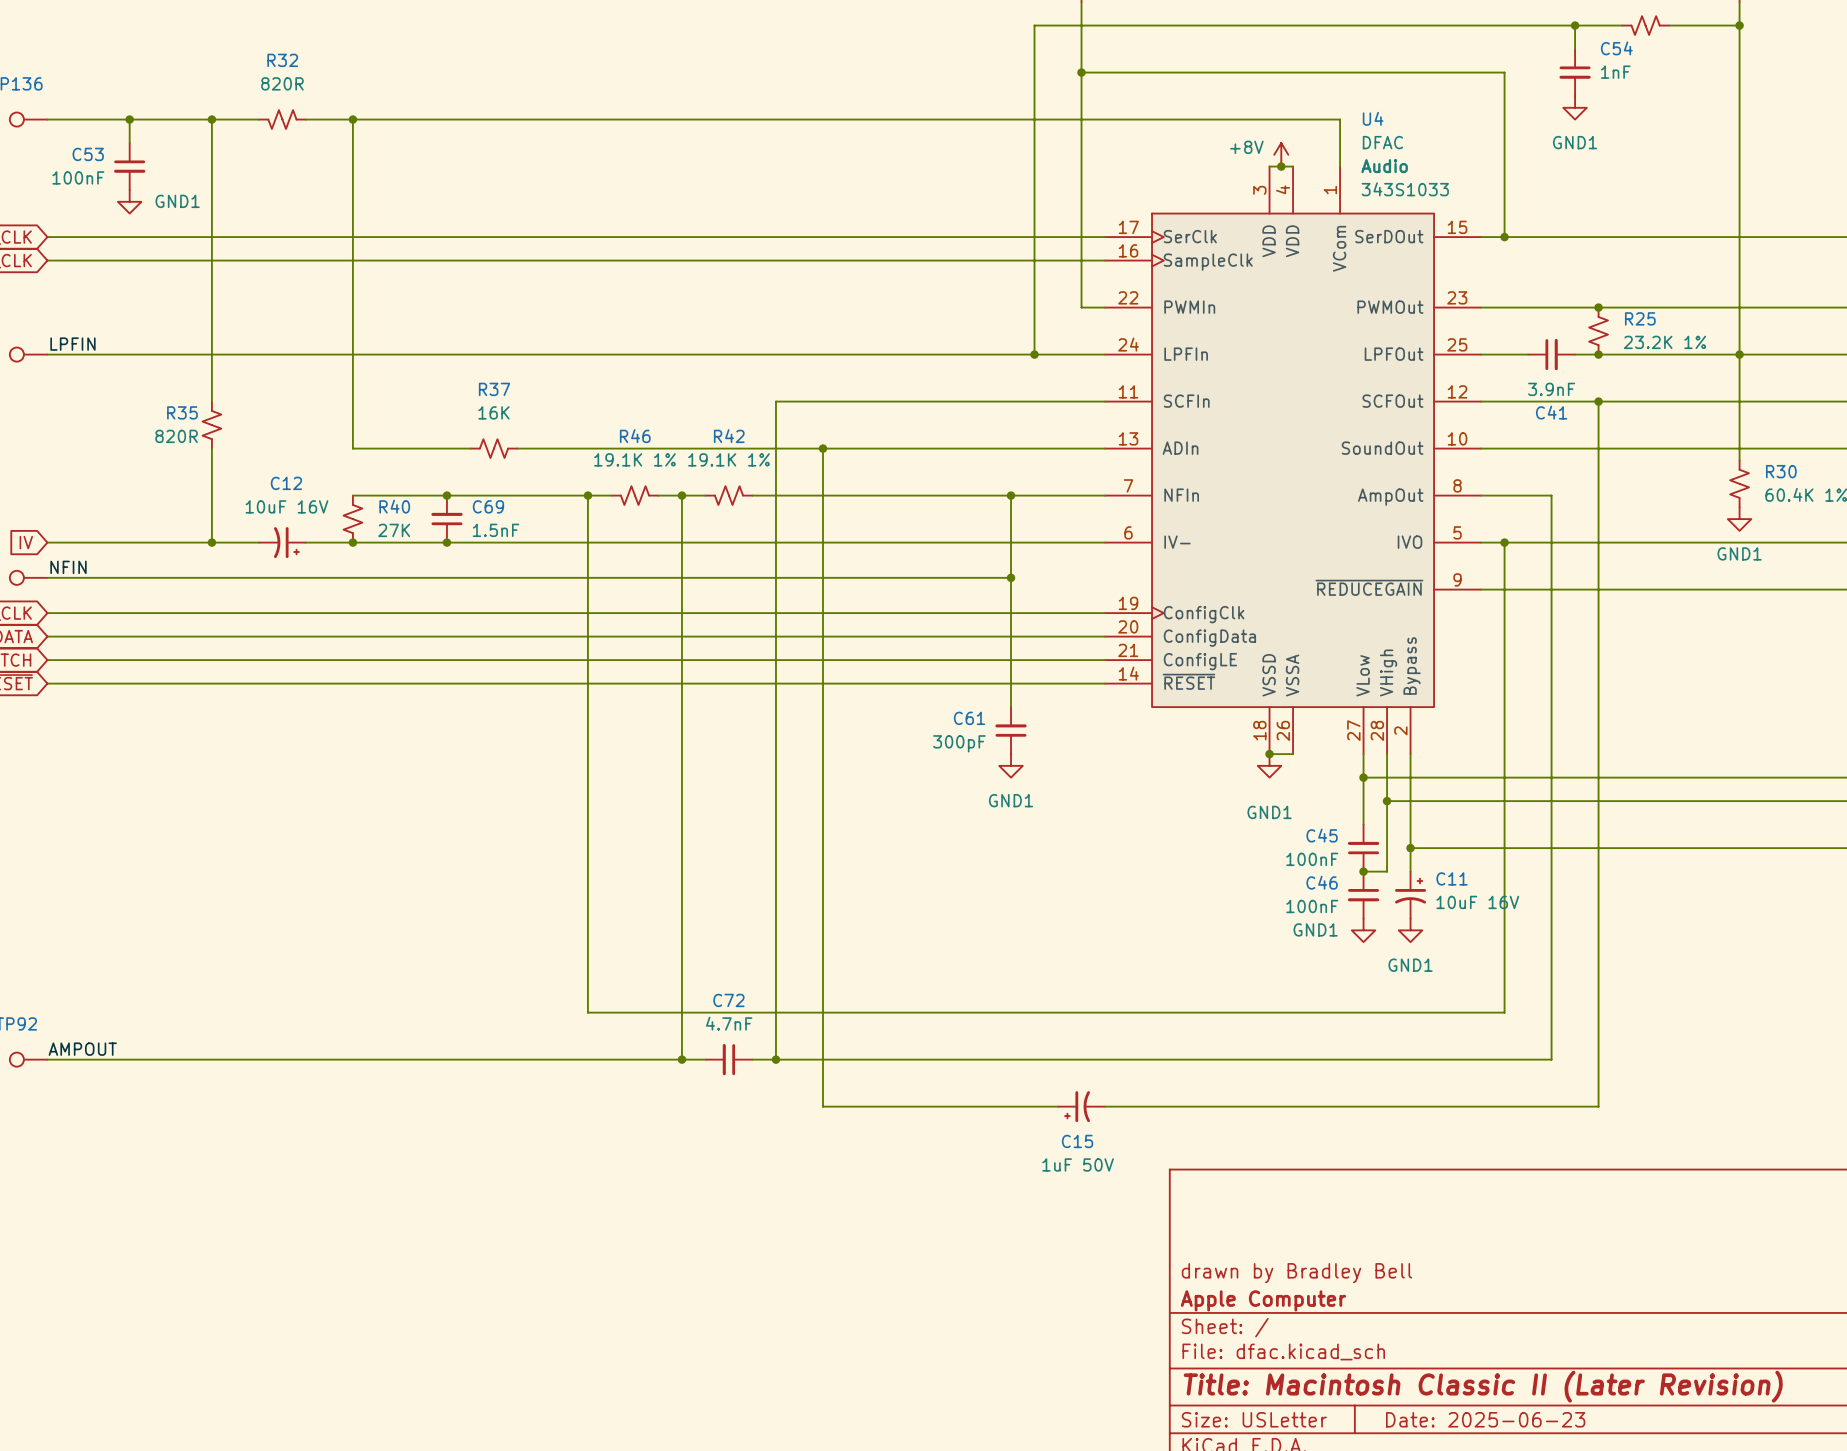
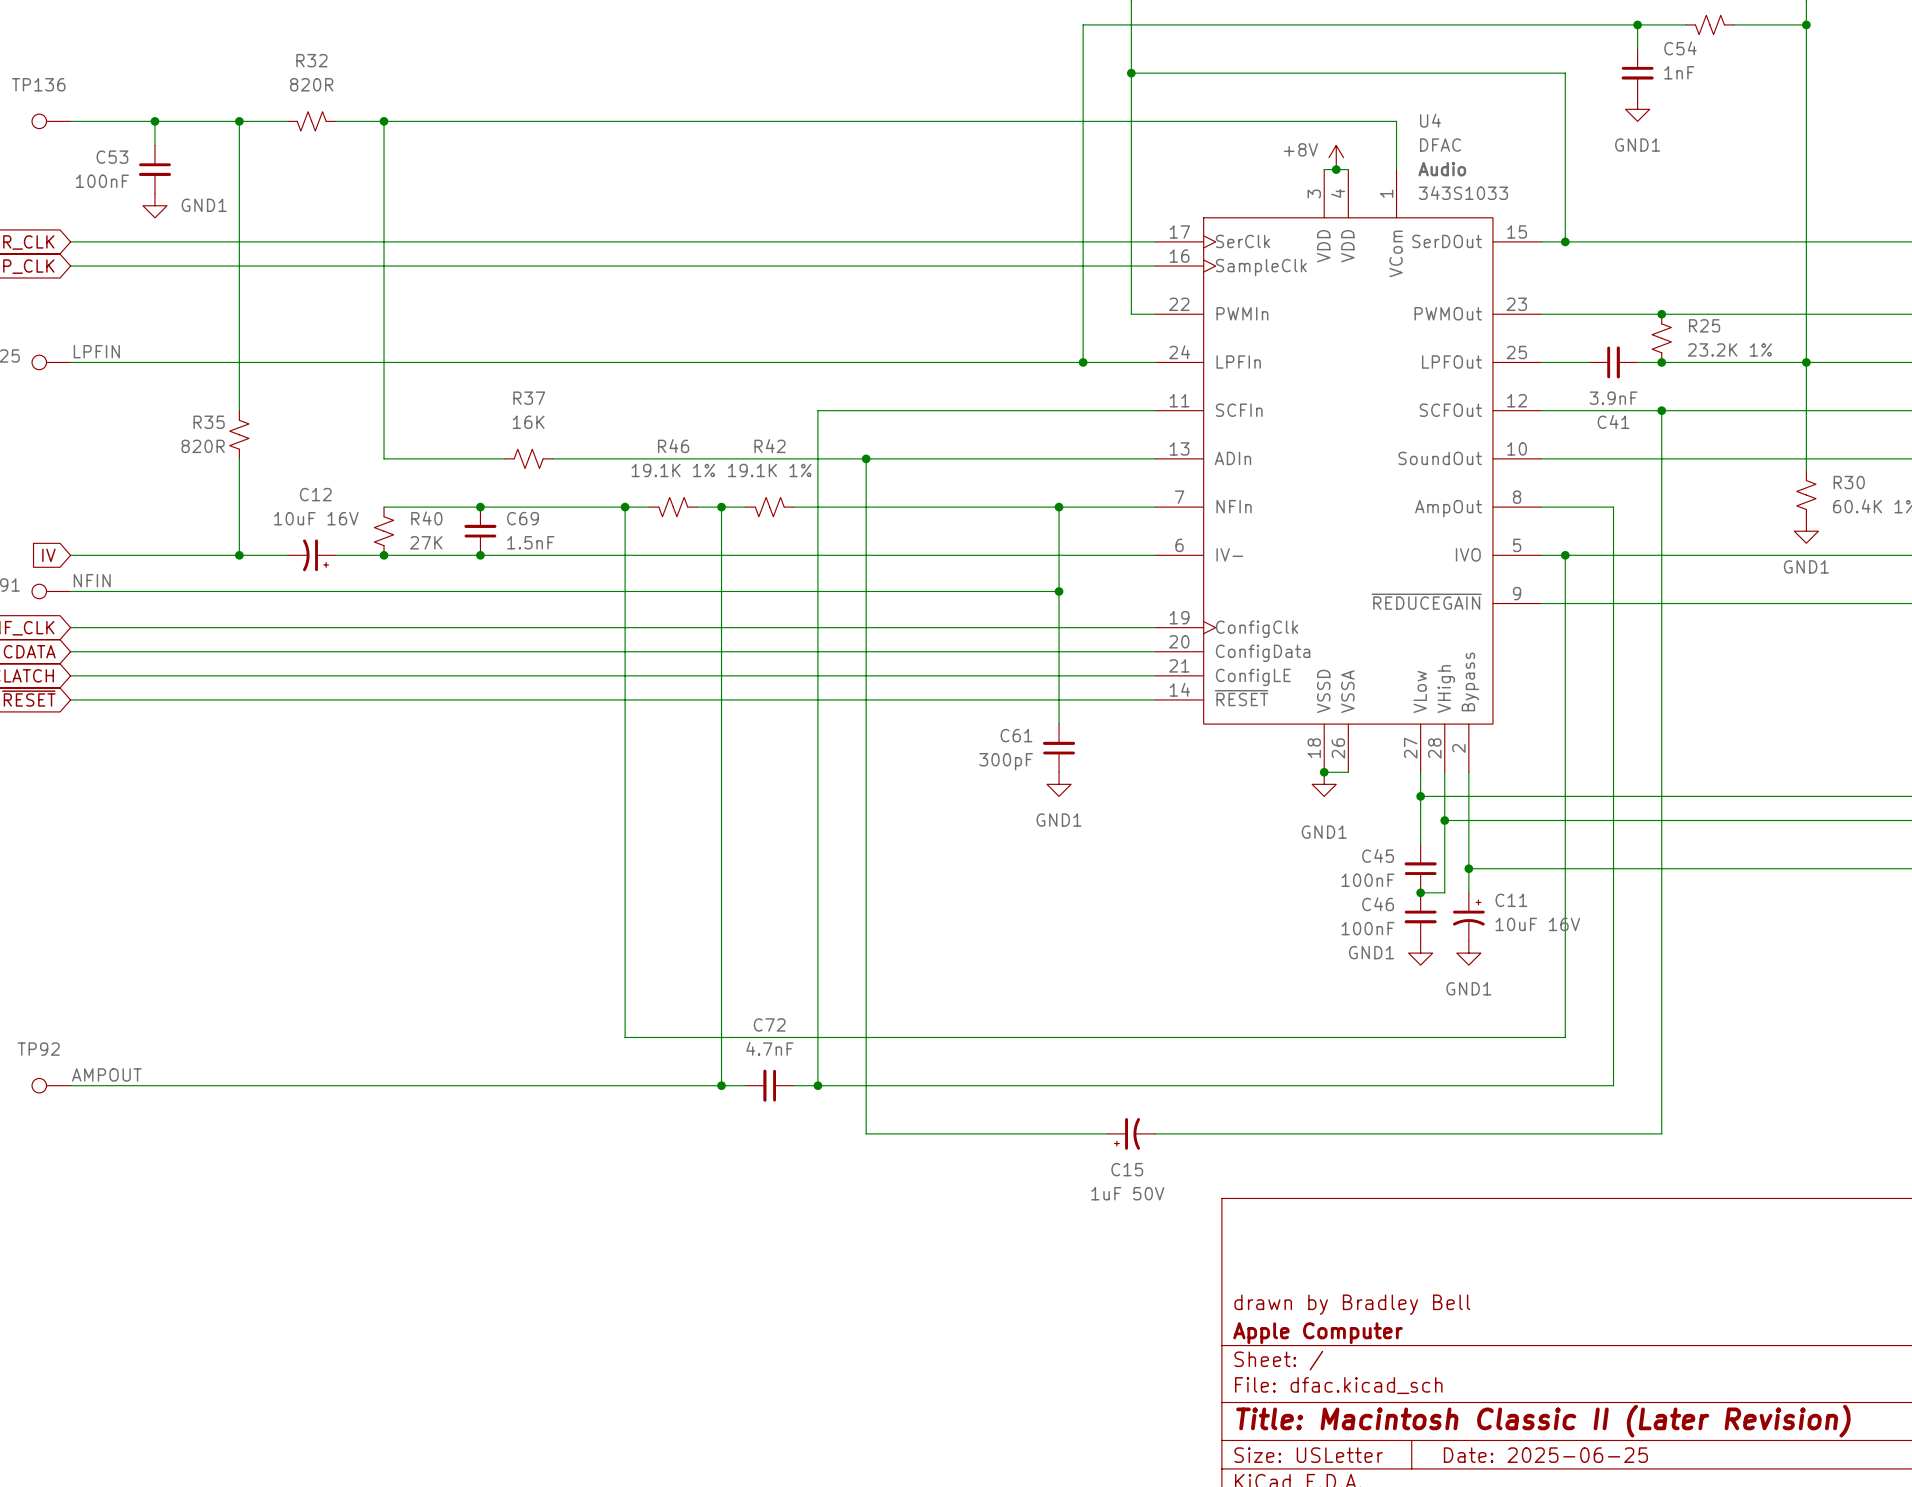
title block: Date: 2025-06-23 (1485, 1419) -> Date: 2025-06-25 (1545, 1455)

